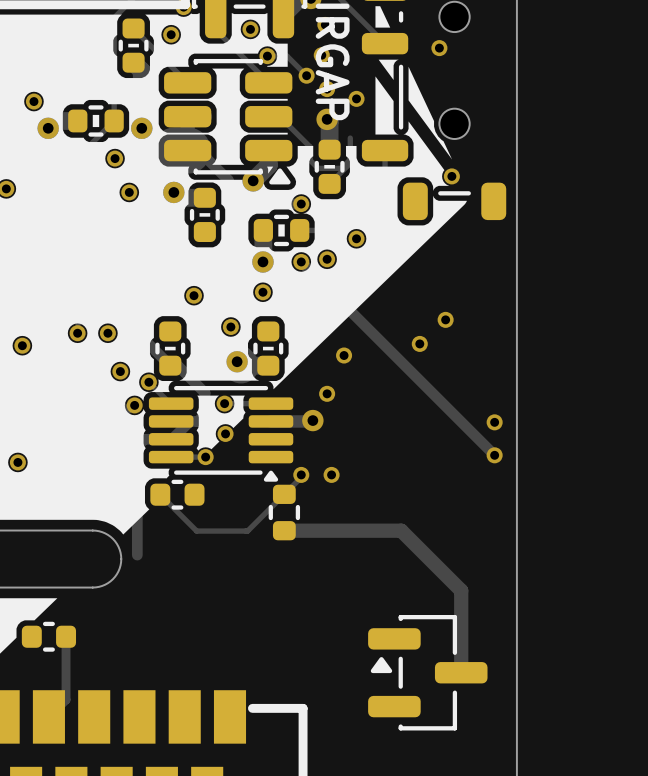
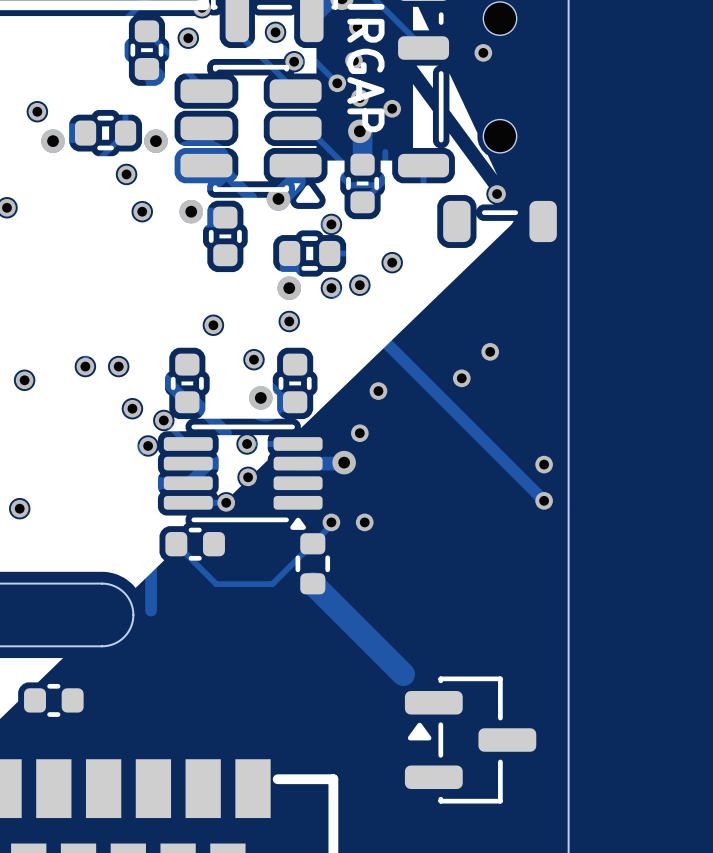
track: (284, 530) (401, 530) (461, 590) (461, 672) -> (312, 583) (403, 674)
track: (66, 636) (66, 699) (48, 716) -> none

